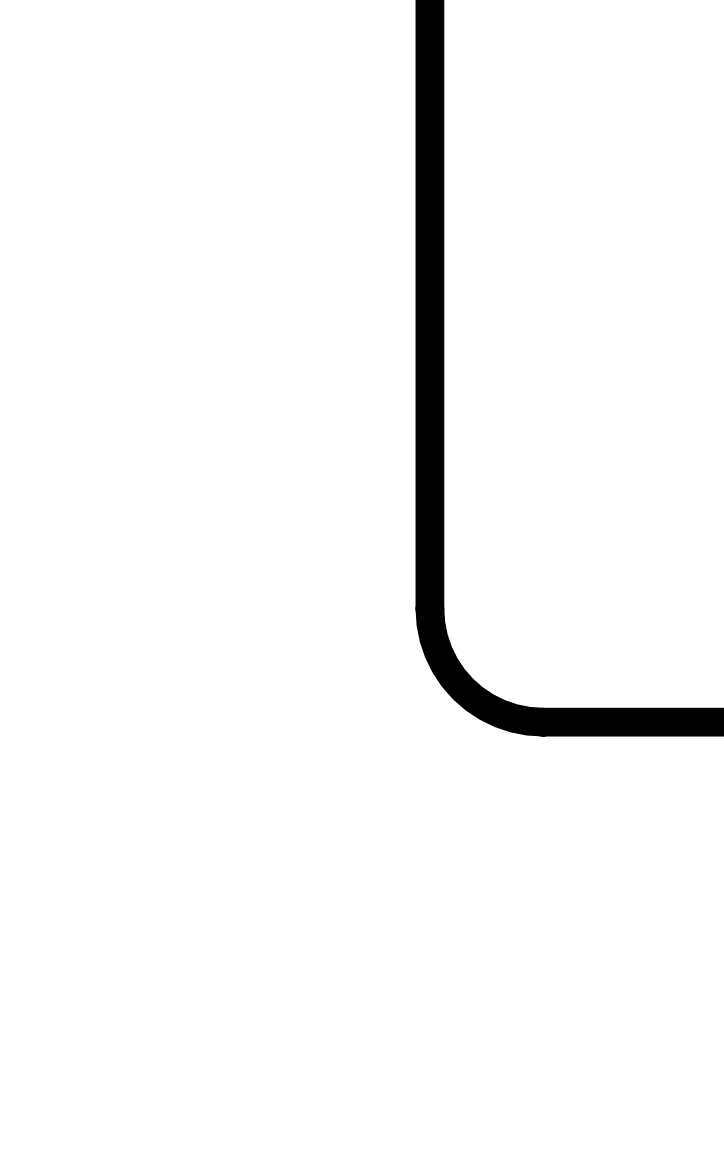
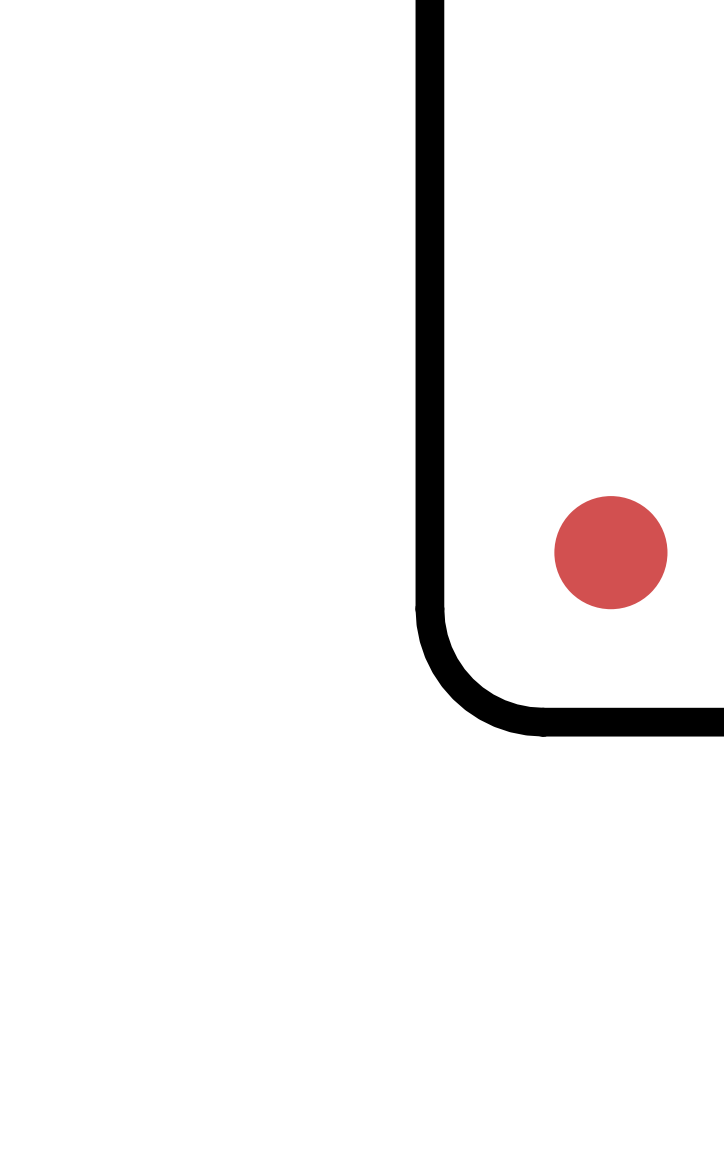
part: none -> (610, 552)

